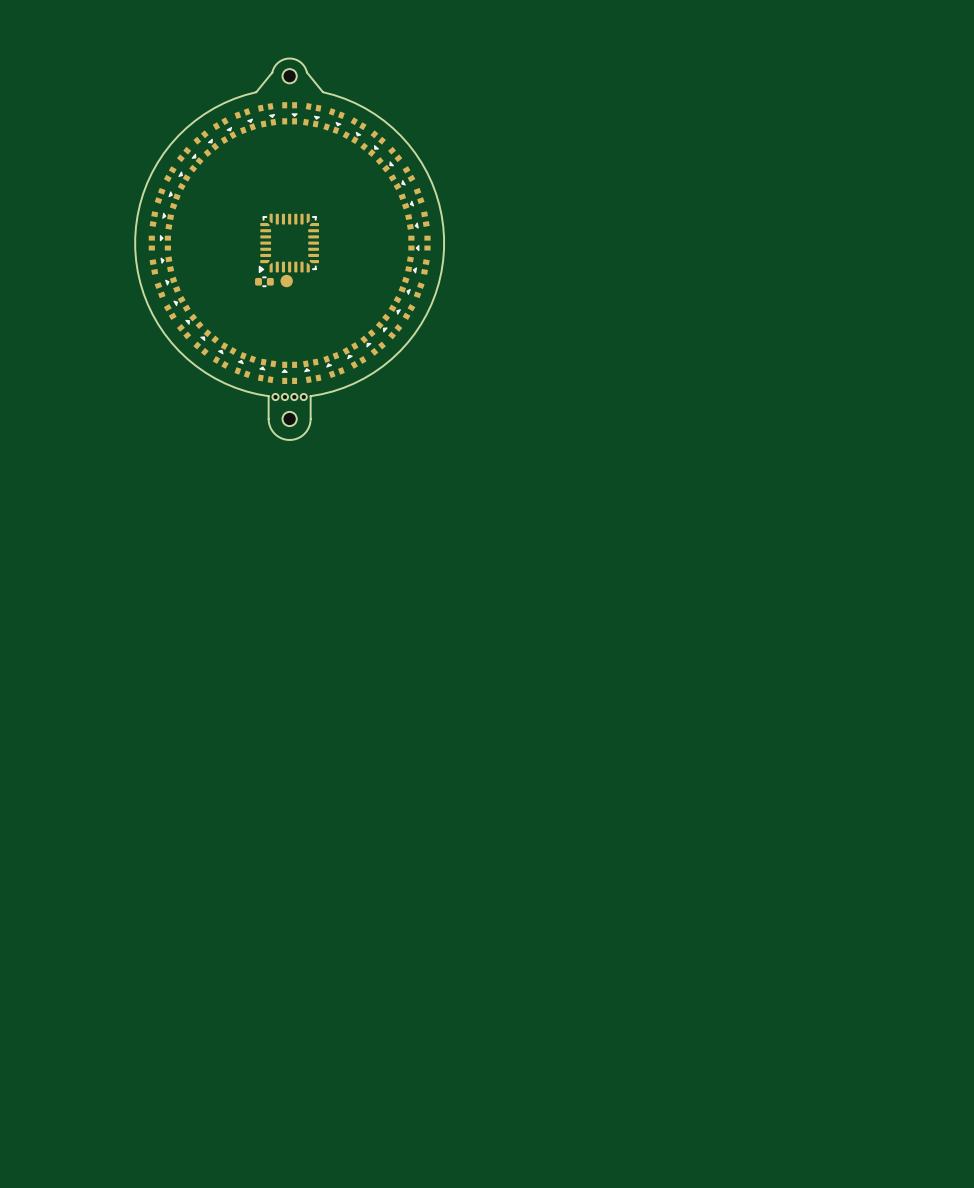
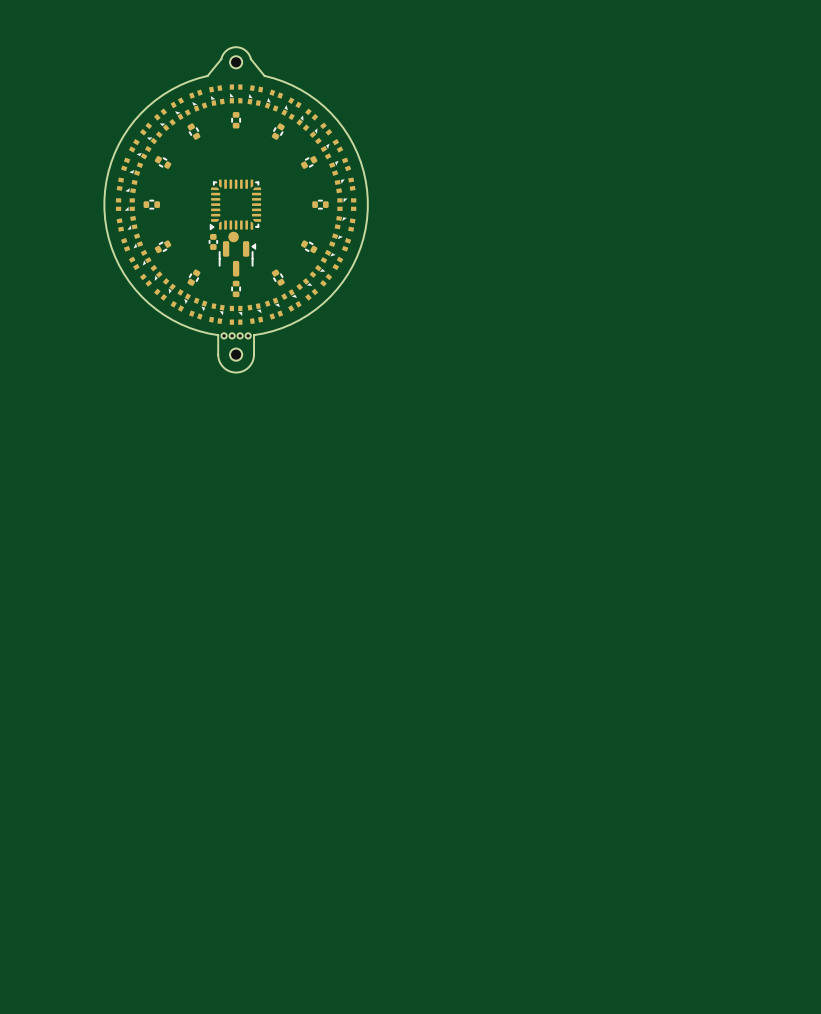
part footprint: [282, 102, 298, 125] -> [229, 84, 243, 104]
part footprint: [257, 103, 277, 128] -> [209, 85, 225, 107]
part footprint: [302, 103, 322, 128] -> [247, 85, 264, 107]
part footprint: [234, 108, 257, 135] -> [189, 89, 208, 112]
part footprint: [323, 108, 345, 135] -> [264, 89, 284, 112]
part footprint: [212, 117, 237, 145] -> [170, 97, 191, 121]
part footprint: [342, 117, 367, 145] -> [281, 97, 302, 121]
part footprint: [193, 130, 220, 157] -> [154, 108, 176, 132]
part footprint: [360, 130, 386, 157] -> [296, 108, 319, 132]
part: none -> (236, 120)
part footprint: [176, 146, 204, 173] -> [139, 122, 163, 145]
part footprint: [375, 146, 403, 173] -> [309, 122, 333, 145]
part: none -> (193, 131)
part: none -> (278, 131)
part footprint: [163, 166, 191, 191] -> [128, 139, 152, 160]
part footprint: [388, 166, 416, 191] -> [320, 139, 344, 160]
part footprint: [154, 187, 181, 210] -> [121, 157, 144, 176]
part footprint: [398, 187, 425, 210] -> [329, 157, 352, 176]
part: none -> (163, 162)
part: none -> (309, 162)
part footprint: [149, 211, 175, 230] -> [116, 177, 138, 194]
part footprint: [405, 211, 430, 230] -> [334, 177, 356, 194]
part footprint: [148, 235, 171, 251] -> [115, 198, 135, 211]
part footprint: [408, 235, 431, 252] -> [337, 198, 357, 211]
part: none -> (151, 204)
part: none -> (320, 204)
part footprint: [149, 256, 175, 275] -> [116, 215, 138, 232]
part footprint: [405, 256, 430, 275] -> [334, 215, 356, 232]
part footprint: [154, 276, 181, 299] -> [121, 233, 144, 252]
part footprint: [398, 276, 425, 299] -> [329, 233, 352, 252]
part rotation: 0° (264, 281) -> 90° clockwise (213, 241)
part: none -> (163, 246)
part: none -> (309, 246)
part footprint: [163, 296, 191, 320] -> [128, 249, 152, 271]
part footprint: [388, 296, 416, 320] -> [320, 249, 344, 271]
part: none -> (237, 258)
part footprint: [176, 313, 204, 340] -> [139, 264, 163, 287]
part footprint: [375, 313, 403, 340] -> [309, 264, 333, 287]
part: none -> (193, 277)
part: none -> (278, 277)
part footprint: [193, 329, 220, 356] -> [154, 278, 176, 301]
part footprint: [360, 329, 386, 356] -> [296, 278, 319, 301]
part: none -> (236, 288)
part footprint: [212, 342, 237, 369] -> [170, 289, 191, 312]
part footprint: [342, 342, 367, 369] -> [281, 289, 302, 312]
part footprint: [234, 352, 257, 379] -> [189, 297, 208, 320]
part footprint: [323, 352, 345, 379] -> [264, 297, 284, 320]
part footprint: [257, 358, 277, 384] -> [209, 303, 225, 325]
part footprint: [302, 358, 322, 384] -> [247, 303, 264, 325]
part footprint: [281, 361, 298, 385] -> [229, 305, 243, 325]

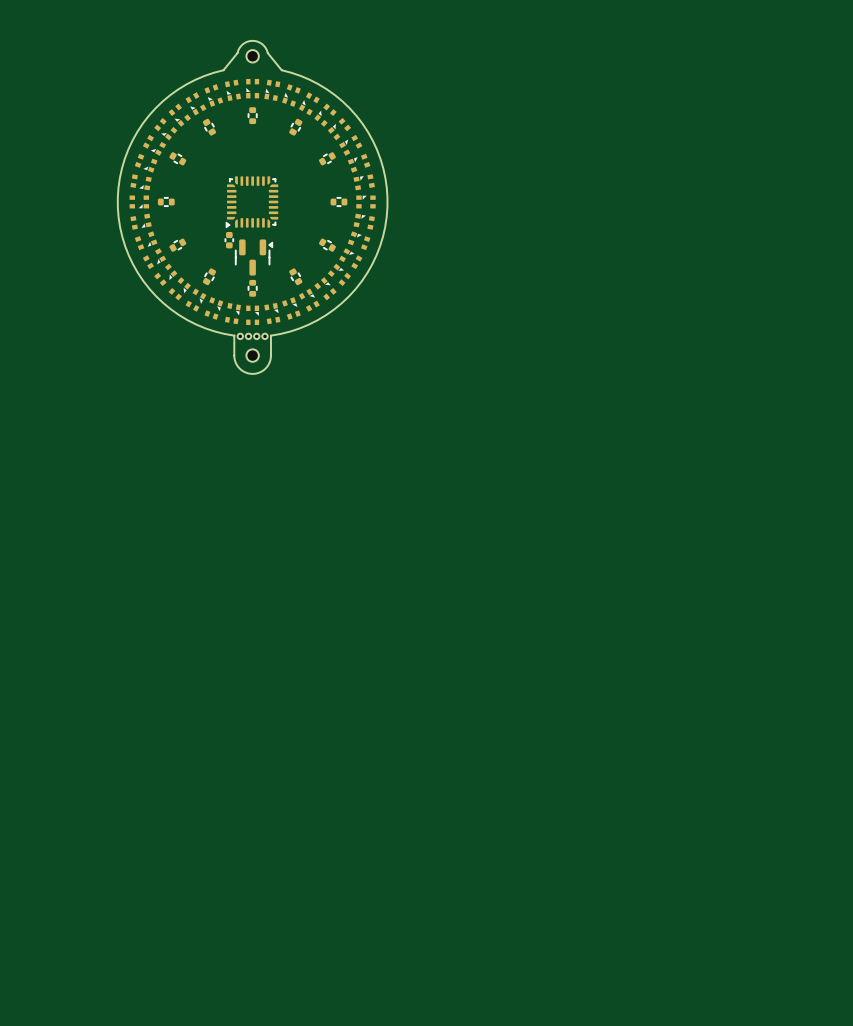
part: (233, 236) -> none

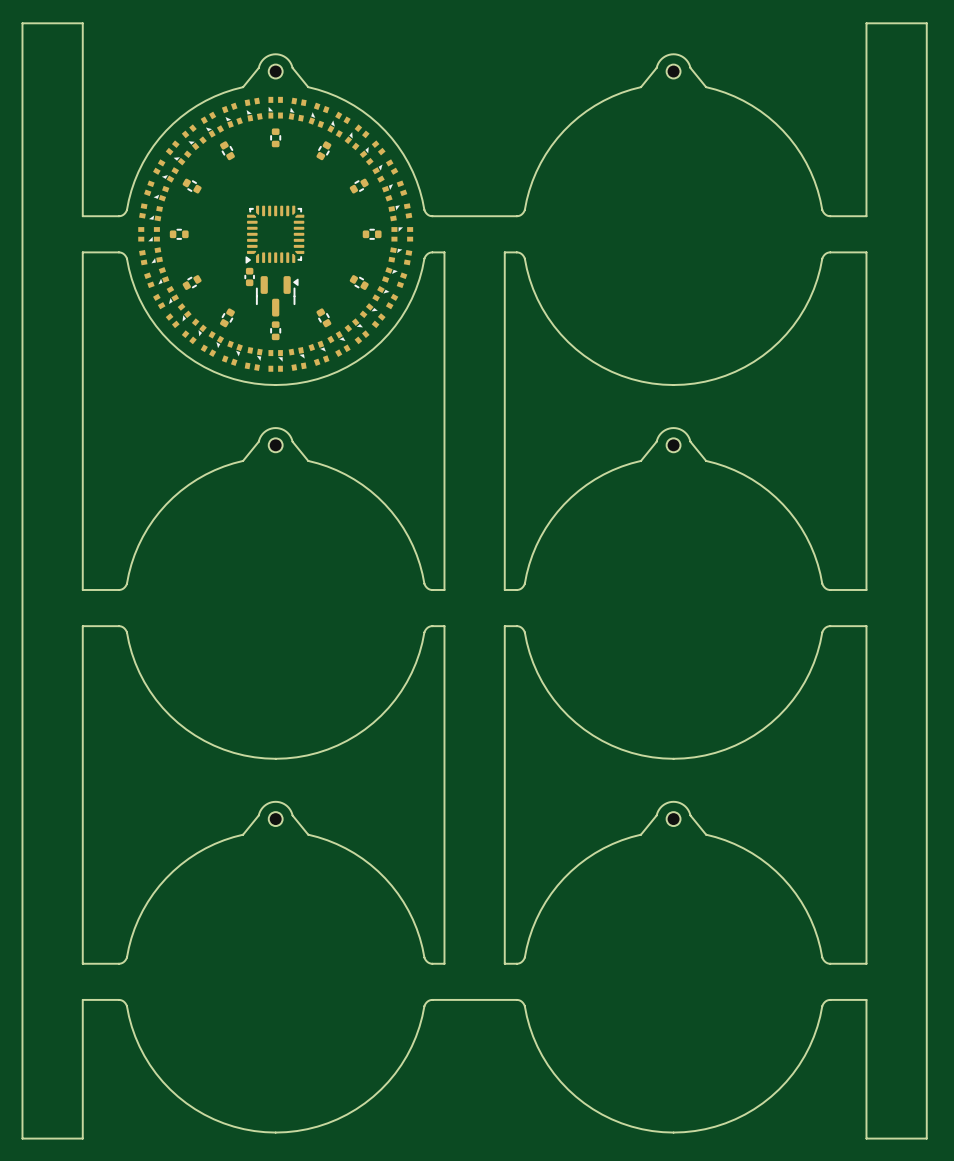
part: none -> (673, 71)
board edge: (223, 70) (186, 84) (162, 101) (148, 115) (137, 131) (124, 158) (119, 177) (117, 207) (125, 246) (133, 264) (149, 289) (163, 303) (187, 320) (214, 331) (234, 335) -> (243, 87) (214, 96) (197, 105) (166, 130) (142, 163) (134, 181) (124, 214) (118, 216) (82, 216) (82, 23) (22, 23) (22, 1138) (82, 1138) (82, 999) (118, 999) (124, 1002) (135, 1036) (144, 1055) (162, 1081) (186, 1103) (223, 1123) (244, 1129) (275, 1132) (307, 1129) (327, 1123) (347, 1114) (373, 1096) (395, 1073) (406, 1055) (416, 1036) (424, 1005) (430, 1000) (520, 1000) (524, 1005) (533, 1036) (542, 1055) (560, 1081) (575, 1096) (593, 1109) (621, 1123) (652, 1131) (673, 1132) (715, 1126) (735, 1119) (762, 1103) (786, 1081) (804, 1055) (813, 1036) (824, 1002) (830, 999) (866, 999) (866, 1138) (926, 1138) (926, 23) (866, 23) (866, 216) (830, 216) (825, 214) (814, 181) (806, 163) (783, 130) (760, 111) (743, 100) (706, 87) (686, 60) (677, 54) (669, 54) (661, 58) (641, 87) (621, 92) (594, 105) (564, 130) (540, 163) (532, 181) (524, 210) (517, 216) (428, 215) (424, 210) (416, 181) (408, 163) (385, 130) (362, 111) (345, 100) (308, 87)
board edge: (281, 70) (309, 79) (327, 89) (356, 115) (367, 131) (380, 158) (385, 177) (387, 207) (380, 246) (367, 272) (355, 289) (341, 303) (317, 320) (299, 328) (270, 335) -> none
board edge: none -> (82, 252) (82, 589) (118, 589) (124, 588) (134, 554) (142, 536) (166, 504) (197, 479) (223, 466) (243, 460) (264, 432) (275, 428) (287, 432) (308, 460) (345, 474) (378, 497) (391, 511) (408, 536) (416, 554) (425, 586) (431, 589) (444, 589) (444, 252) (431, 252) (426, 255) (416, 289) (406, 308) (388, 334) (364, 355) (337, 371) (317, 379) (275, 385) (254, 383) (223, 375) (186, 355) (162, 334) (144, 308) (135, 289) (124, 254) (118, 252) (82, 252)
board edge: none -> (504, 252) (504, 589) (517, 589) (523, 586) (532, 554) (540, 536) (557, 511) (571, 497) (603, 474) (641, 460) (661, 432) (673, 428) (685, 432) (706, 460) (725, 466) (752, 479) (783, 504) (806, 536) (814, 554) (825, 588) (830, 589) (866, 589) (866, 252) (830, 252) (824, 254) (813, 289) (804, 308) (786, 334) (762, 355) (735, 371) (715, 379) (673, 385) (631, 379) (611, 371) (584, 355) (560, 334) (542, 308) (533, 289) (523, 255) (517, 252) (504, 252)
part: (252, 353) -> none
part: none -> (275, 445)
part: none -> (673, 445)
board edge: none -> (82, 626) (82, 963) (118, 963) (124, 961) (134, 928) (142, 910) (166, 878) (188, 858) (205, 848) (243, 834) (264, 806) (275, 801) (287, 806) (308, 834) (345, 848) (378, 871) (391, 885) (408, 910) (416, 928) (425, 960) (431, 963) (444, 963) (444, 626) (431, 626) (426, 629) (416, 663) (406, 682) (388, 708) (364, 729) (327, 749) (296, 757) (275, 758) (254, 757) (223, 749) (186, 729) (162, 708) (144, 682) (135, 663) (124, 628) (118, 626) (82, 626)
board edge: none -> (504, 626) (504, 963) (517, 963) (523, 960) (532, 928) (540, 910) (557, 885) (571, 871) (603, 848) (641, 834) (661, 806) (673, 801) (685, 806) (706, 834) (725, 840) (752, 853) (783, 878) (806, 910) (814, 928) (825, 961) (830, 963) (866, 963) (866, 626) (830, 626) (824, 628) (813, 663) (804, 682) (786, 708) (762, 729) (725, 749) (694, 757) (673, 758) (641, 755) (621, 749) (584, 729) (560, 708) (542, 682) (533, 663) (523, 629) (517, 626) (504, 626)
part: none -> (275, 819)
part: none -> (673, 819)

